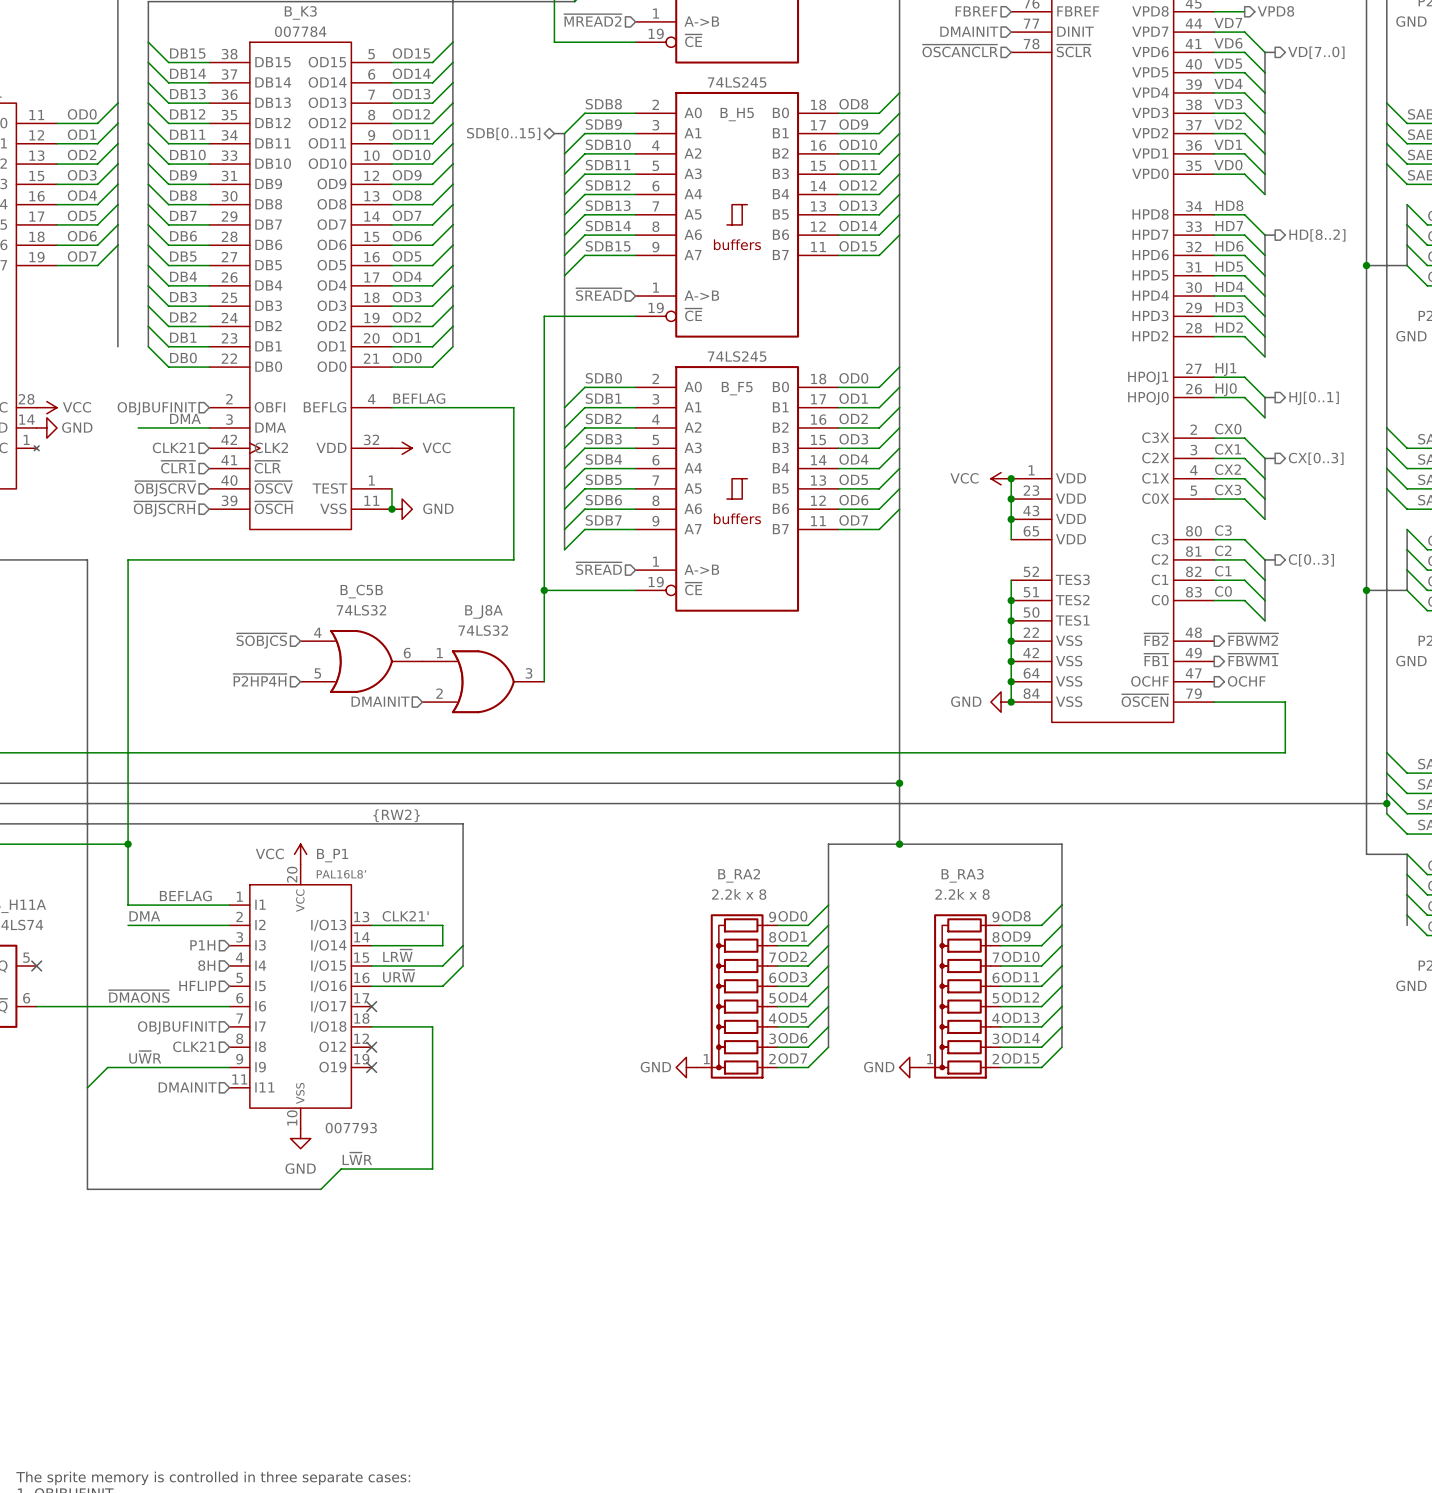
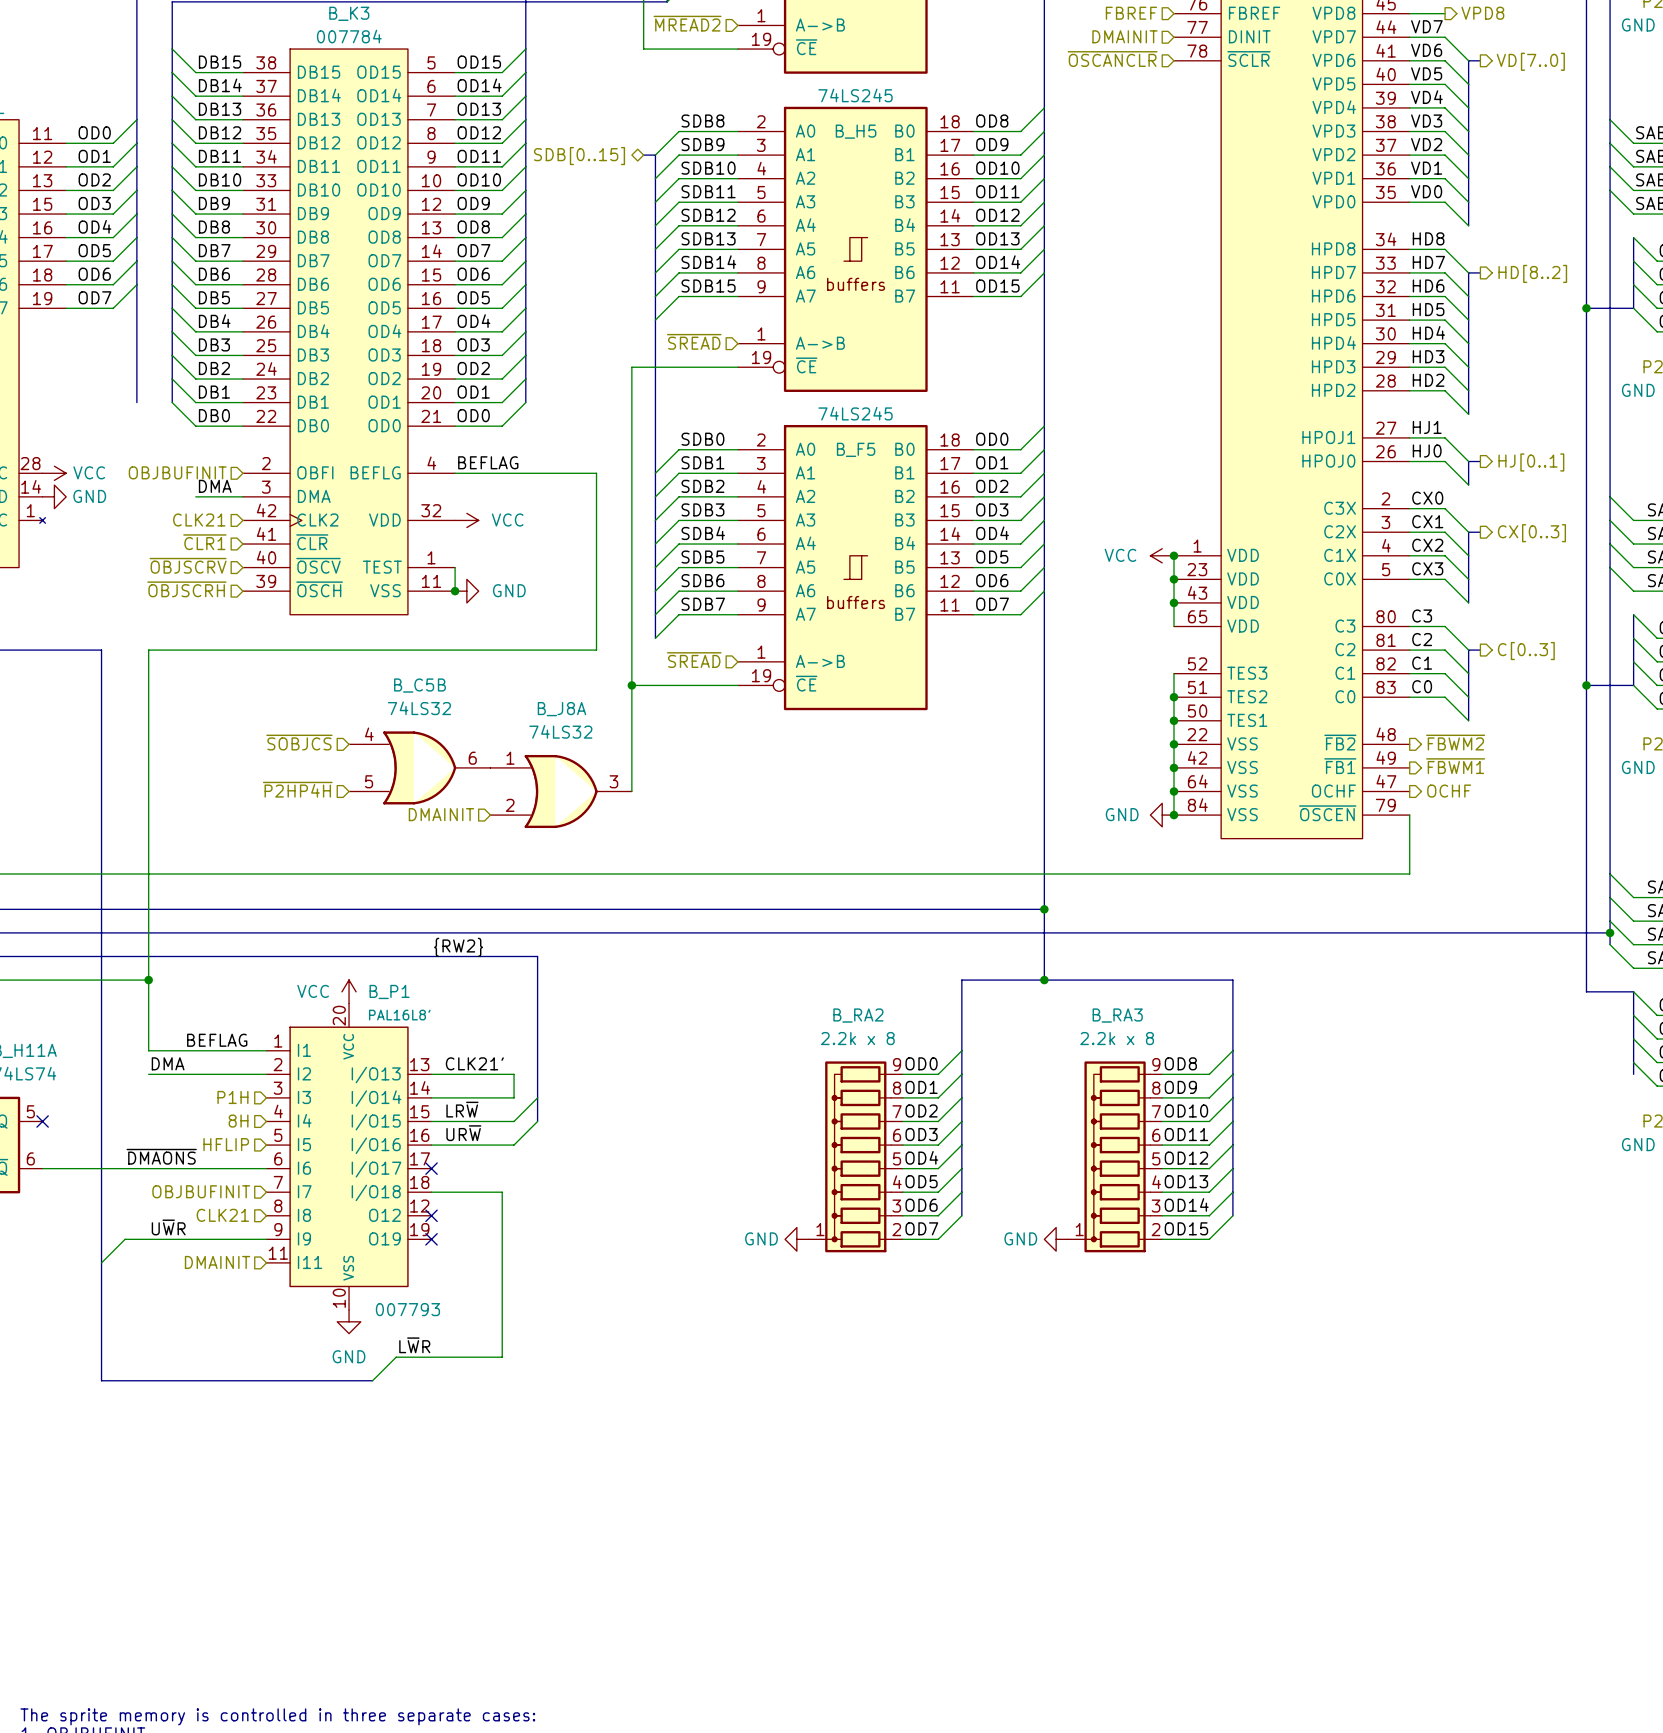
wire: (138, 427) (168, 427) -> none
wire: (1214, 702) (1285, 702) (1285, 752) (1214, 752) -> (1409, 815) (1409, 874)

